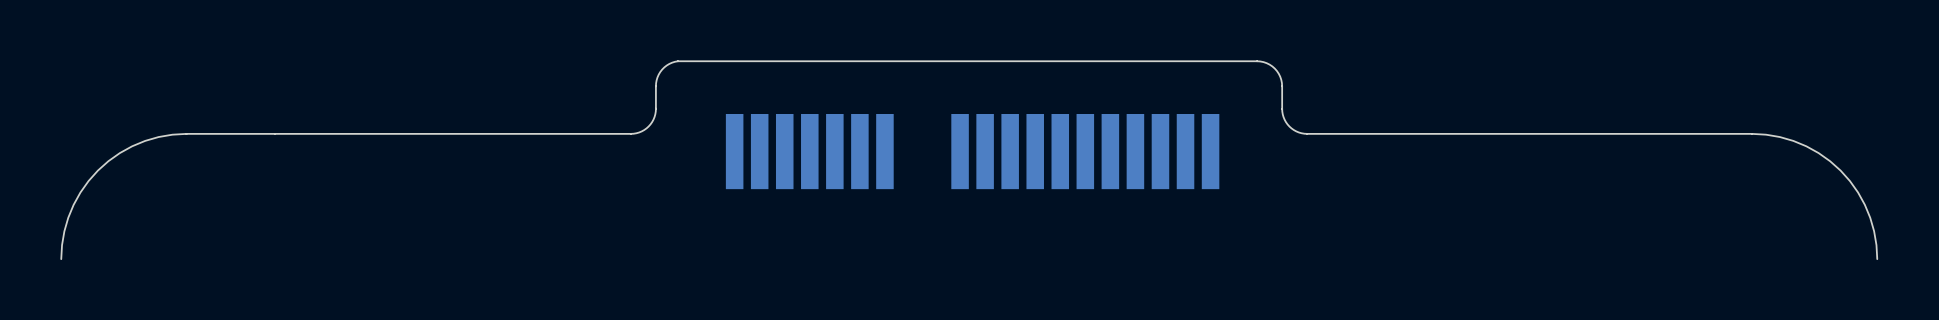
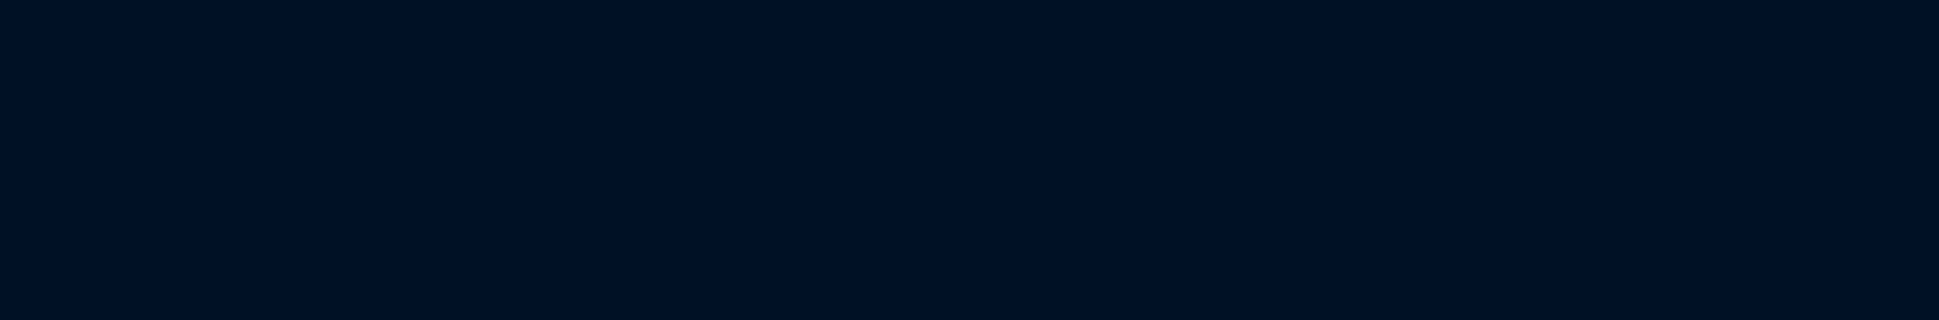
drawing: [60, 60, 1878, 260] -> none
part: (972, 151) -> none

